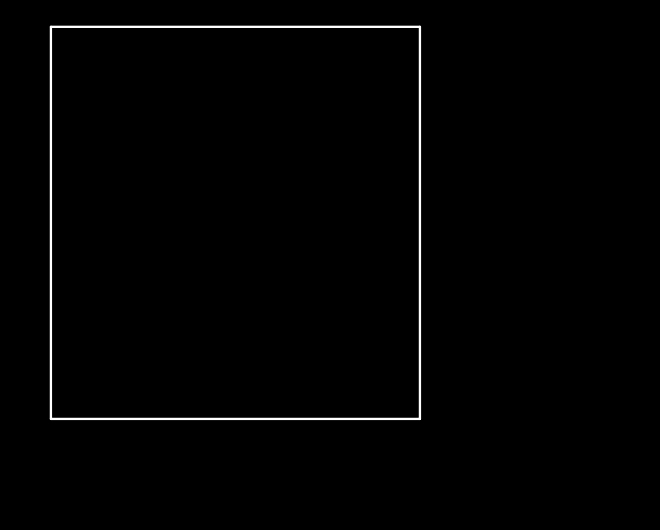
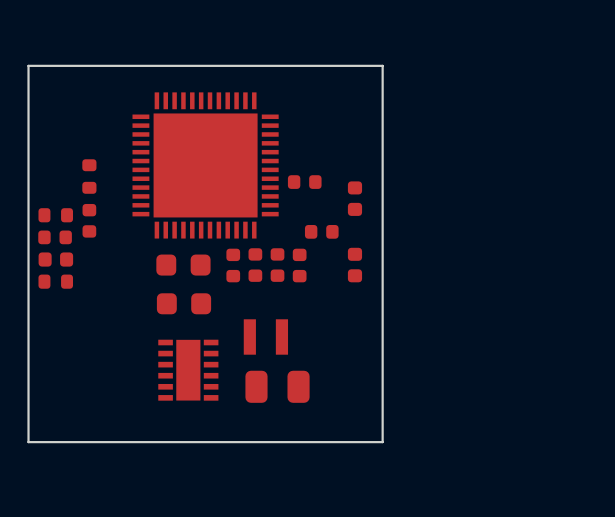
part: none -> (205, 165)
part: none -> (89, 176)
part: none -> (304, 182)
part: none -> (354, 198)
part: none -> (55, 215)
part: none -> (89, 220)
part: none -> (321, 231)
part: none -> (55, 237)
part: none -> (55, 259)
part: none -> (183, 265)
part: none -> (233, 265)
part: none -> (255, 265)
part: none -> (277, 265)
part: none -> (299, 265)
part: none -> (354, 265)
part: none -> (55, 281)
part: none -> (184, 303)
part: none -> (265, 336)
part: none -> (188, 370)
part: none -> (277, 386)

